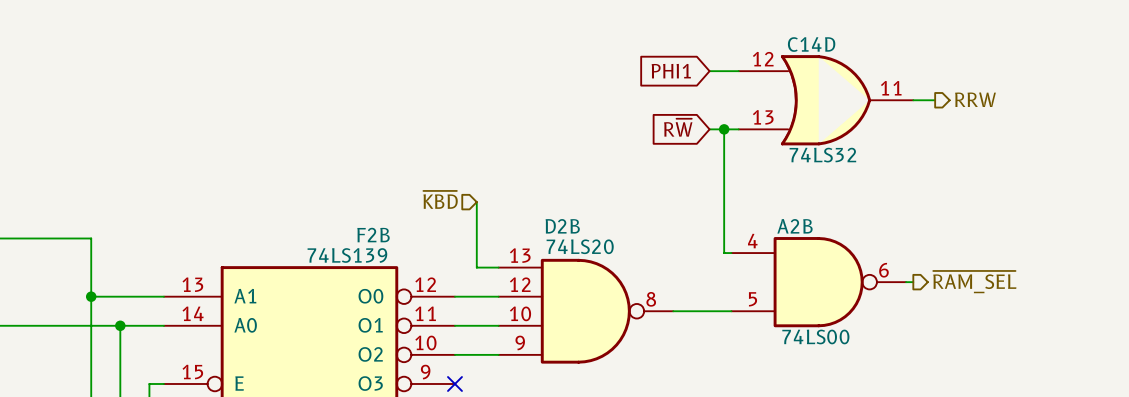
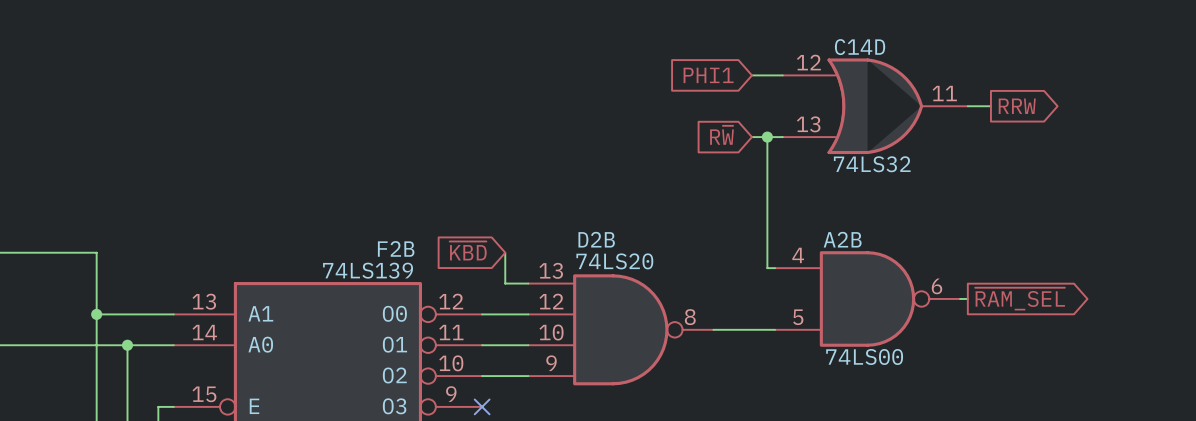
hierarchical label: RRW (975, 99) -> none
global label: none -> RRW (1017, 106)
hierarchical label: ~{KBD} (440, 199) -> none
wire: (476, 202) (476, 238) -> none
global label: none -> ~{KBD} (468, 250)
global label: none -> ~{RAM_SEL} (1020, 299)
hierarchical label: ~{RAM_SEL} (974, 282) -> none

